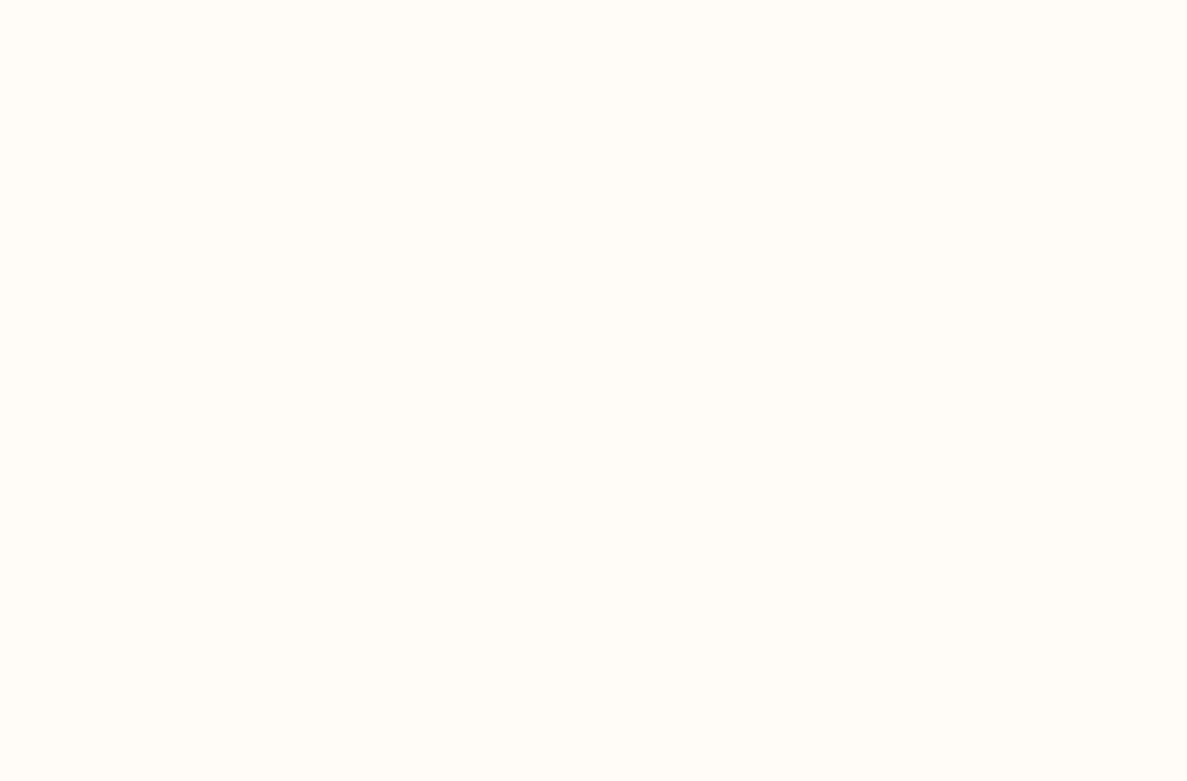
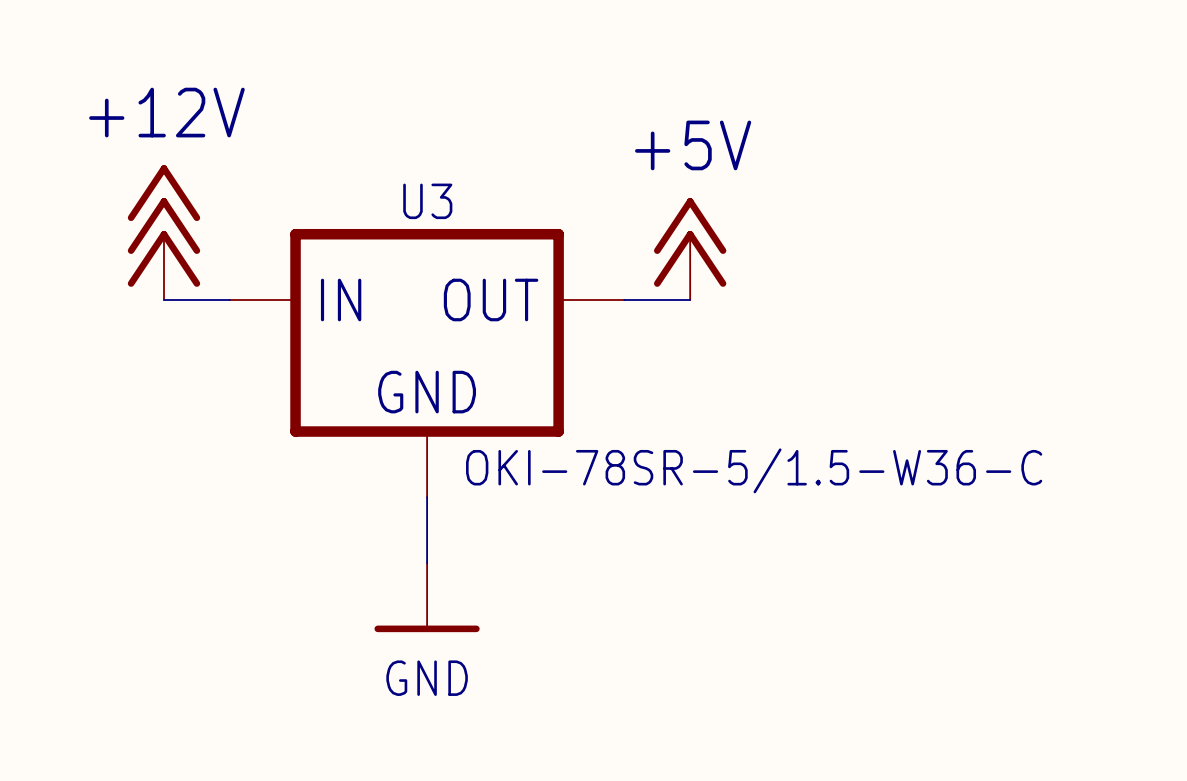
power symbol: none -> +12V (163, 232)
power symbol: none -> +5V (690, 249)
wire: none -> (163, 300) (229, 300)
wire: none -> (624, 300) (690, 300)
U3: none -> (427, 363)
wire: none -> (427, 497) (427, 563)
power symbol: none -> GND (427, 597)

